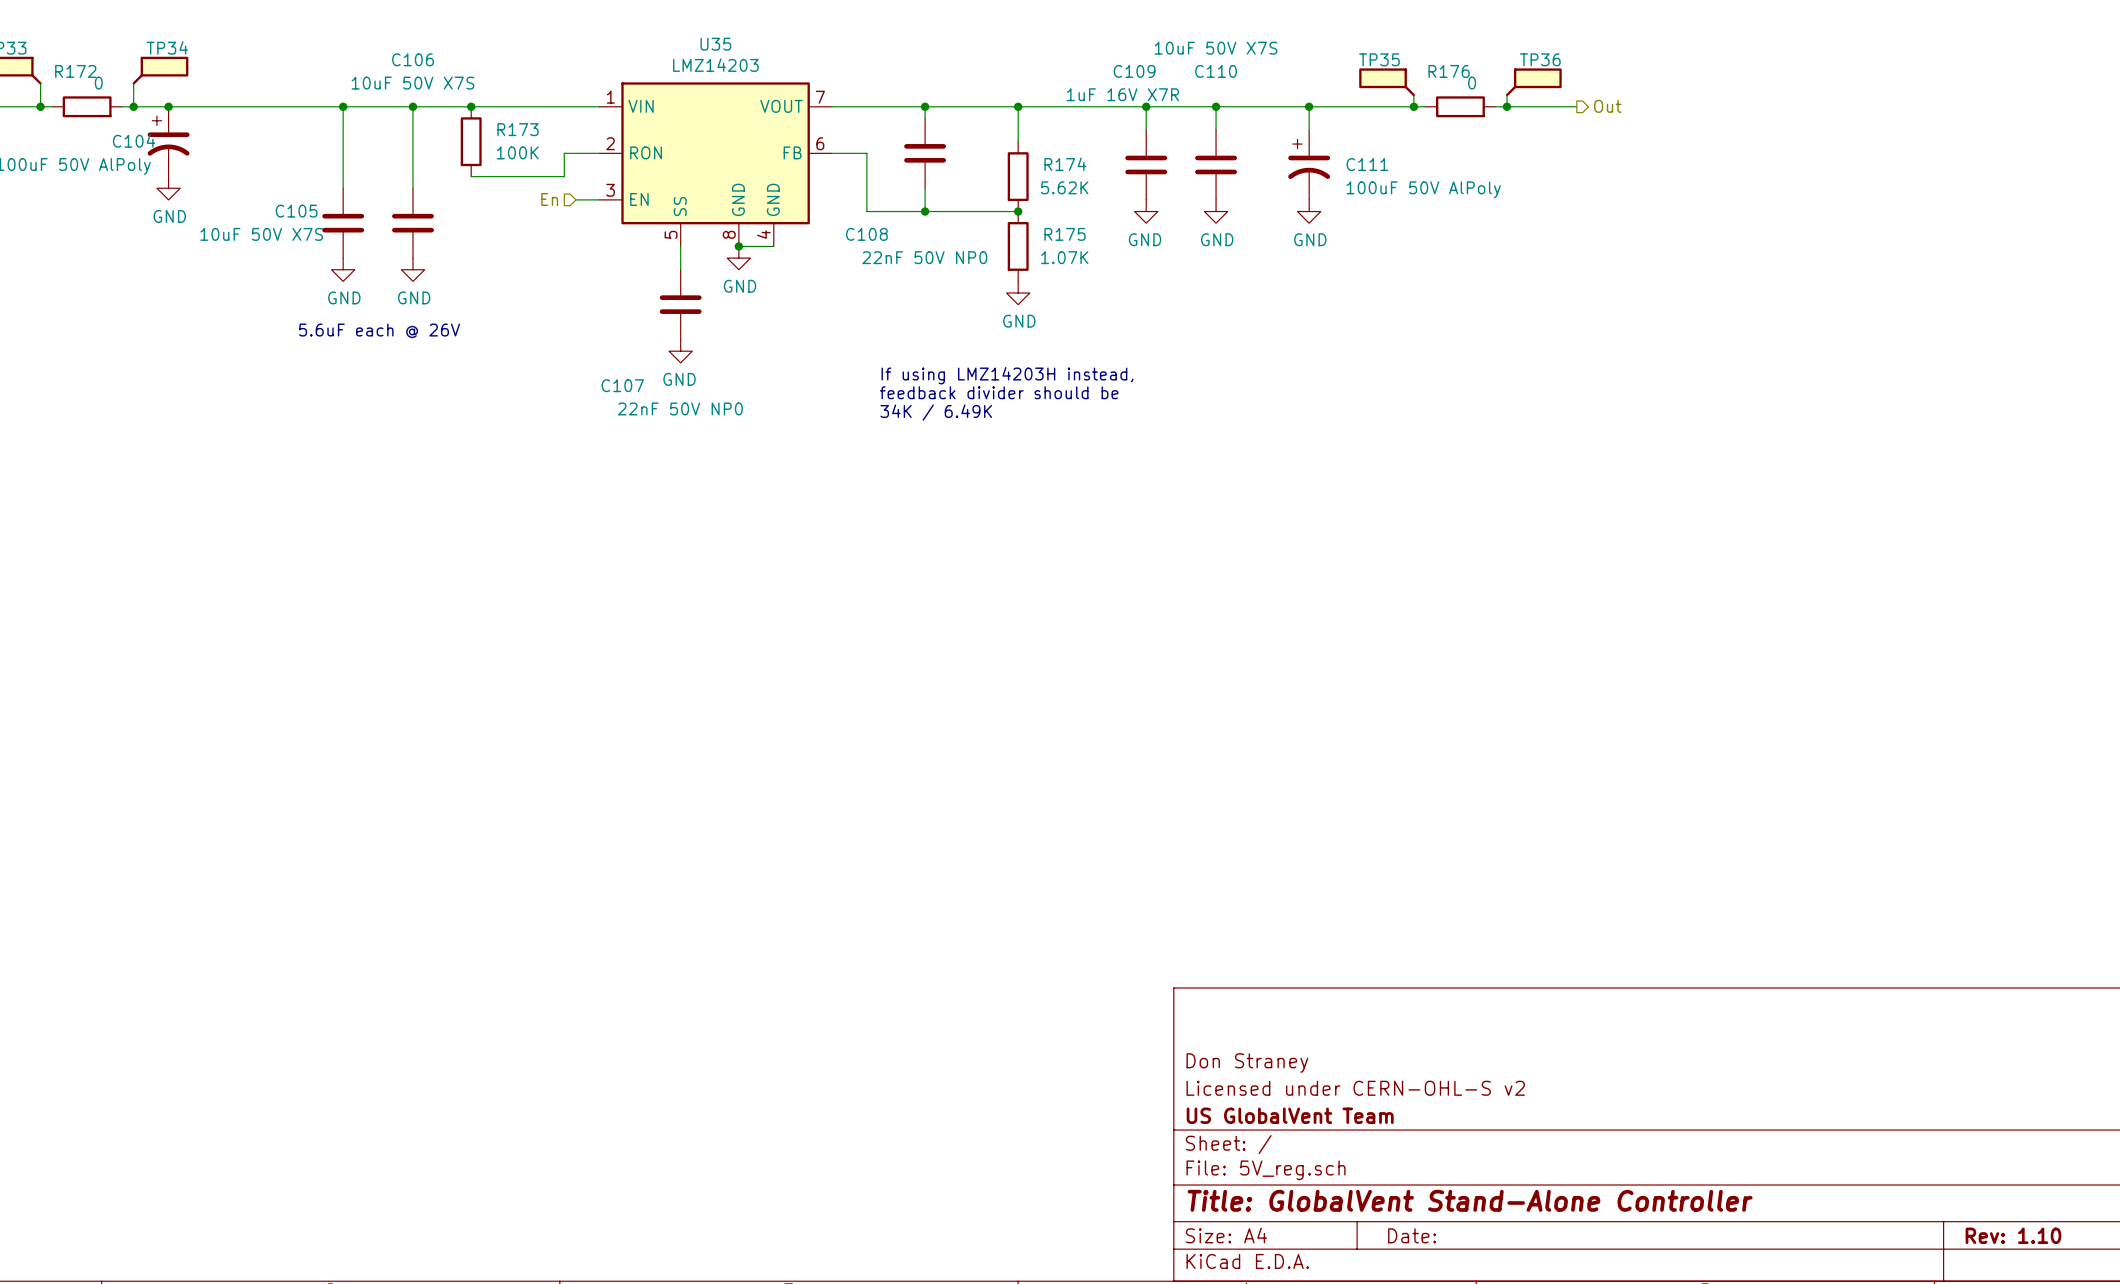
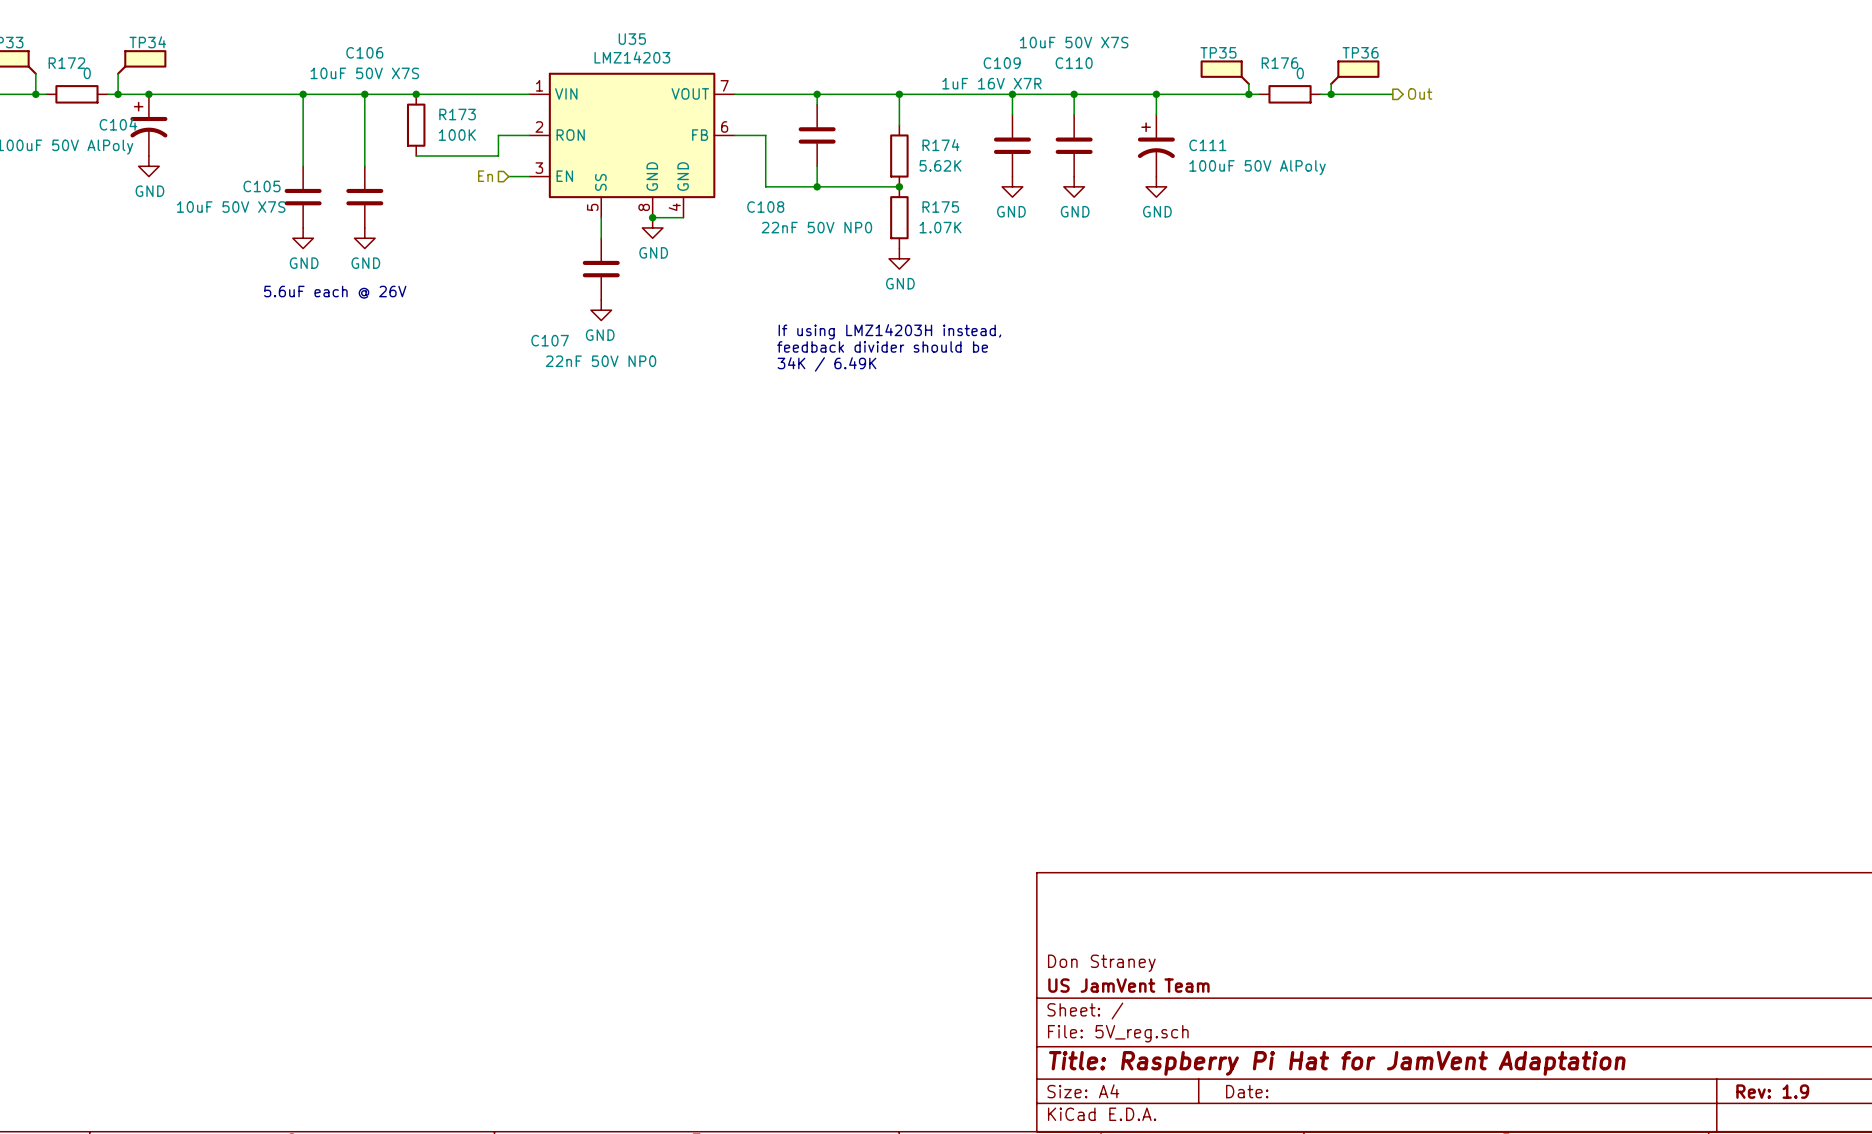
title block: Don Straney (1247, 1063) -> none
title block: Licensed under CERN-OHL-S v2 (1355, 1088) -> Don Straney (1101, 963)
title block: US GlobalVent Team (1290, 1115) -> US JamVent Team (1128, 985)
title block: Title: GlobalVent Stand-Alone Controller (1470, 1200) -> Title: Raspberry Pi Hat for JamVent Adaptation (1337, 1063)
title block: Rev: 1.10 (2013, 1235) -> Rev: 1.9 (1772, 1091)

